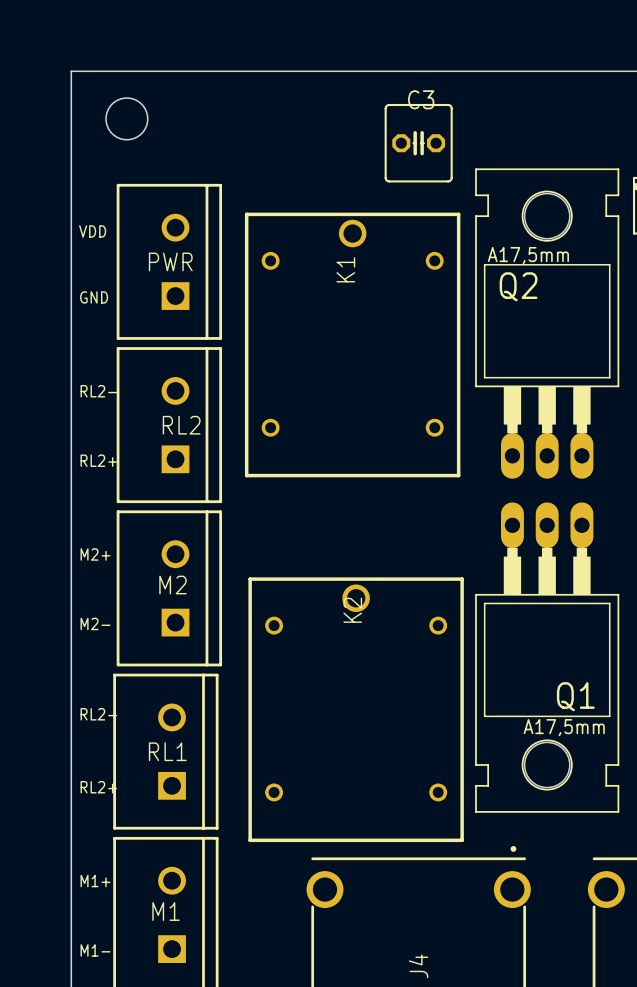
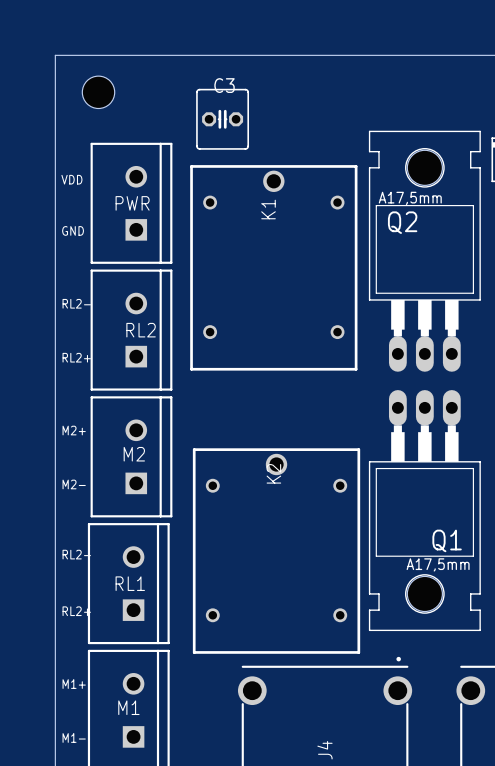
C3 position: (418, 143) -> (222, 119)

